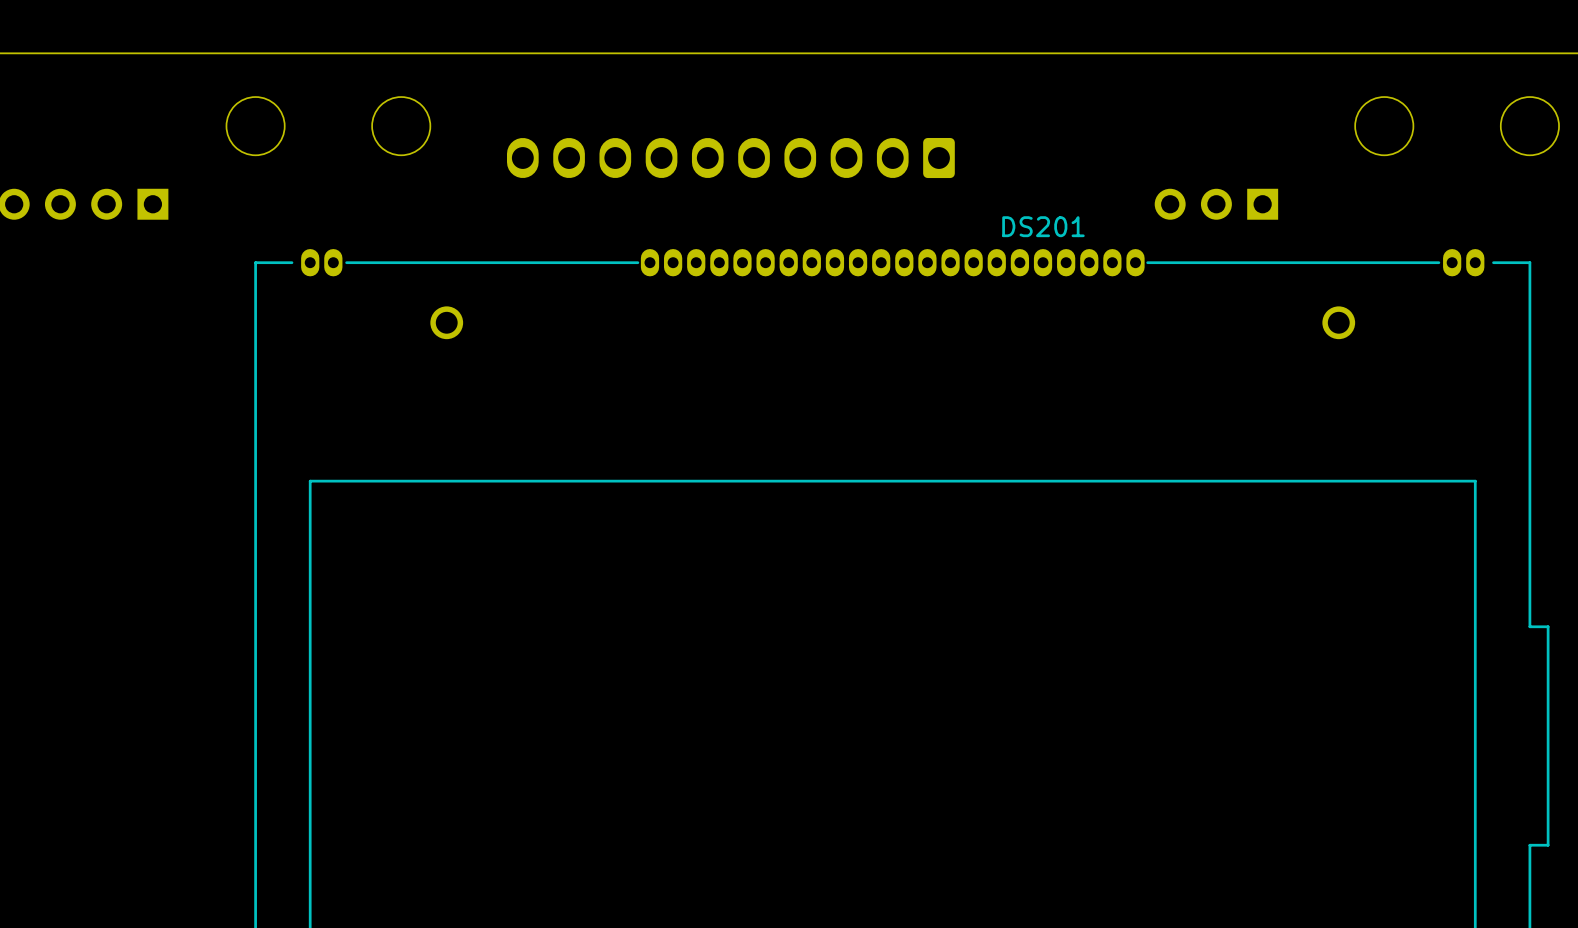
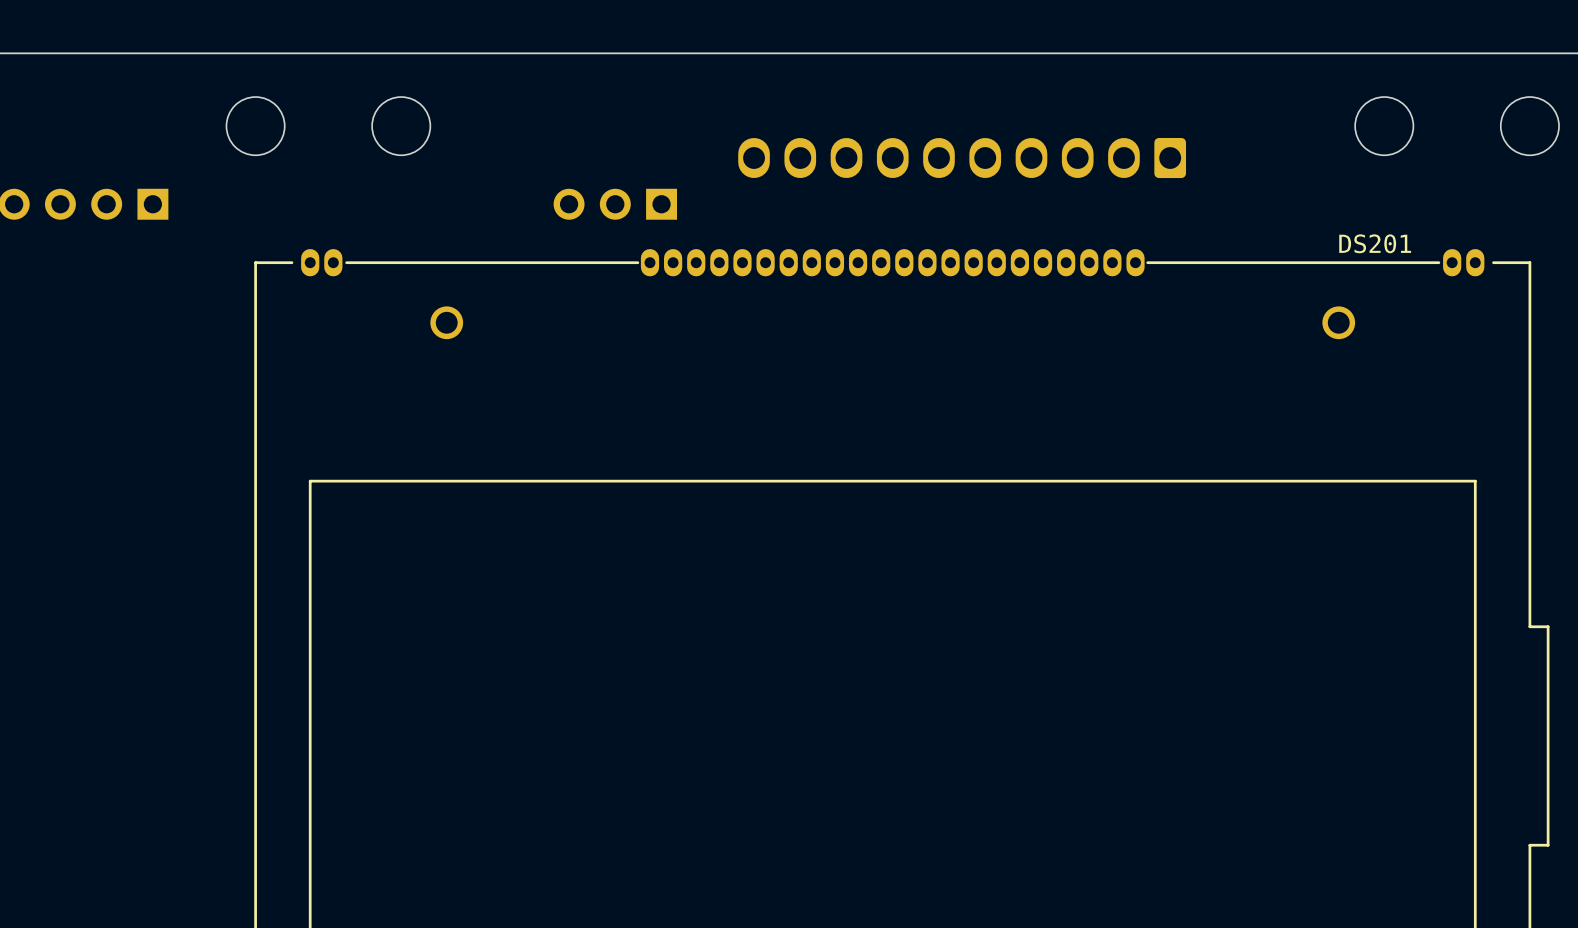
part position: (730, 158) -> (962, 158)
part: none -> (615, 204)
part: (1216, 204) -> none
DS201 name position: DS201 (1043, 226) -> DS201 (1375, 243)

